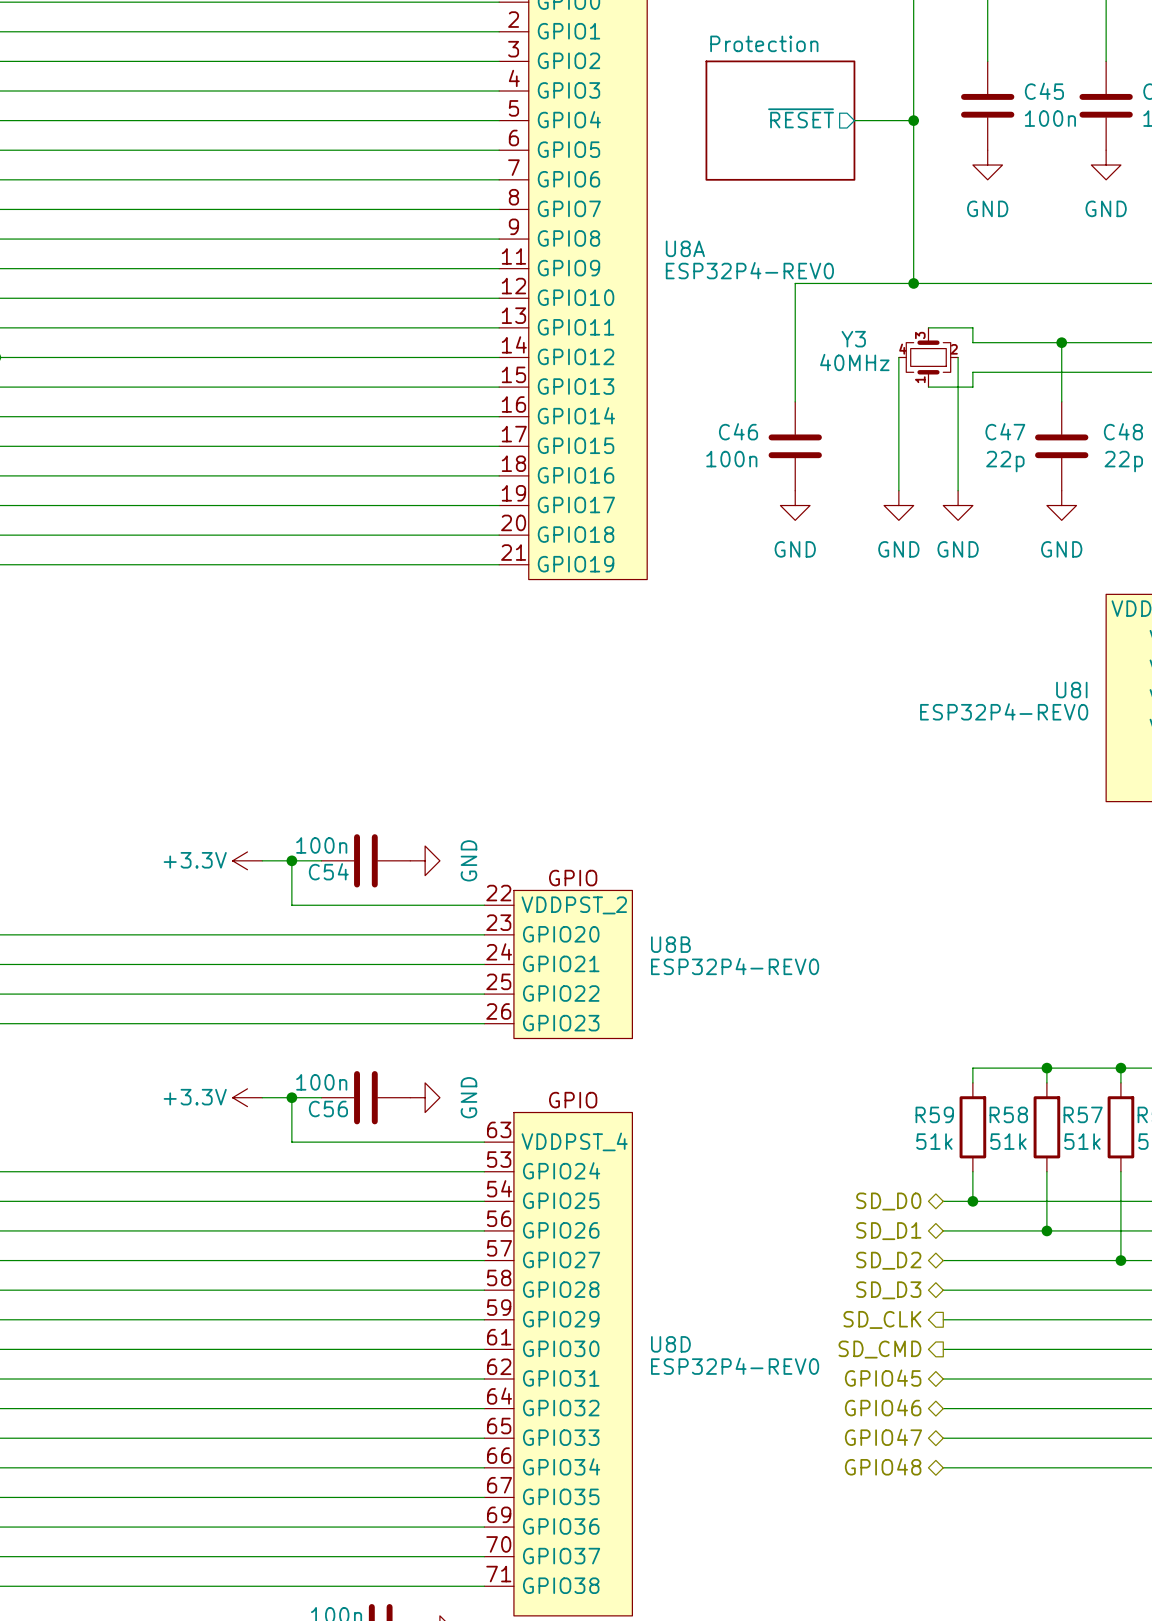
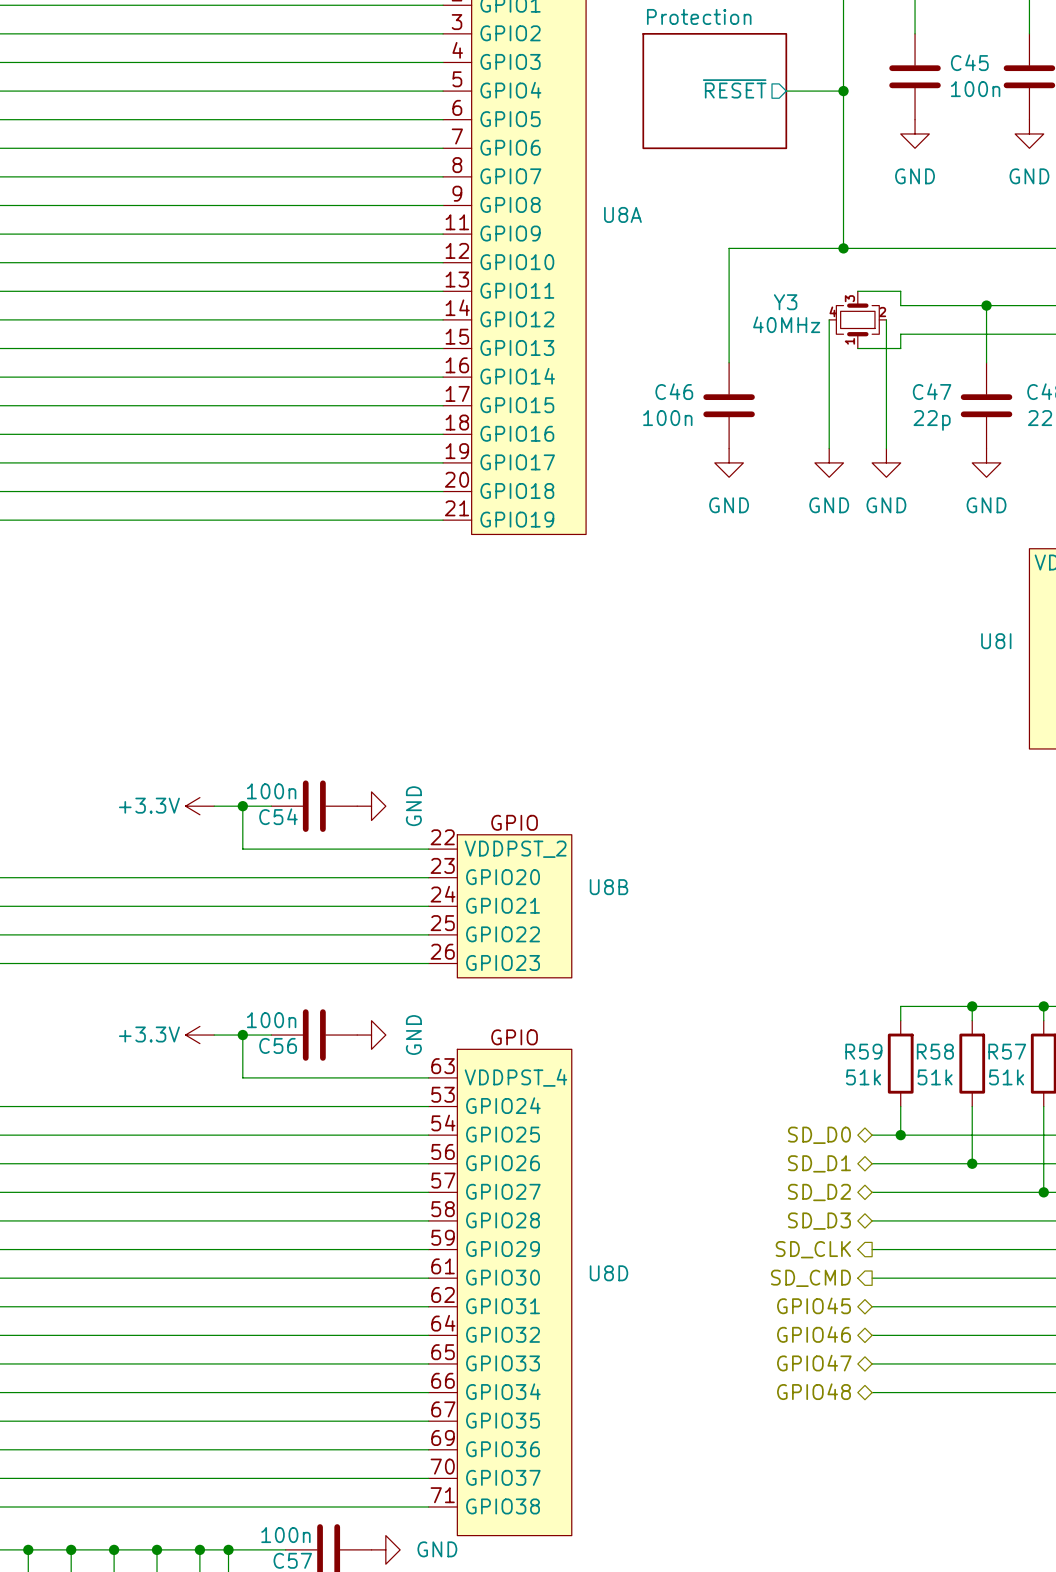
U8A value: ESP32P4-REV0 (749, 270) -> none
U8I value: ESP32P4-REV0 (1004, 711) -> none
U8B value: ESP32P4-REV0 (735, 966) -> none
U8D value: ESP32P4-REV0 (735, 1366) -> none

